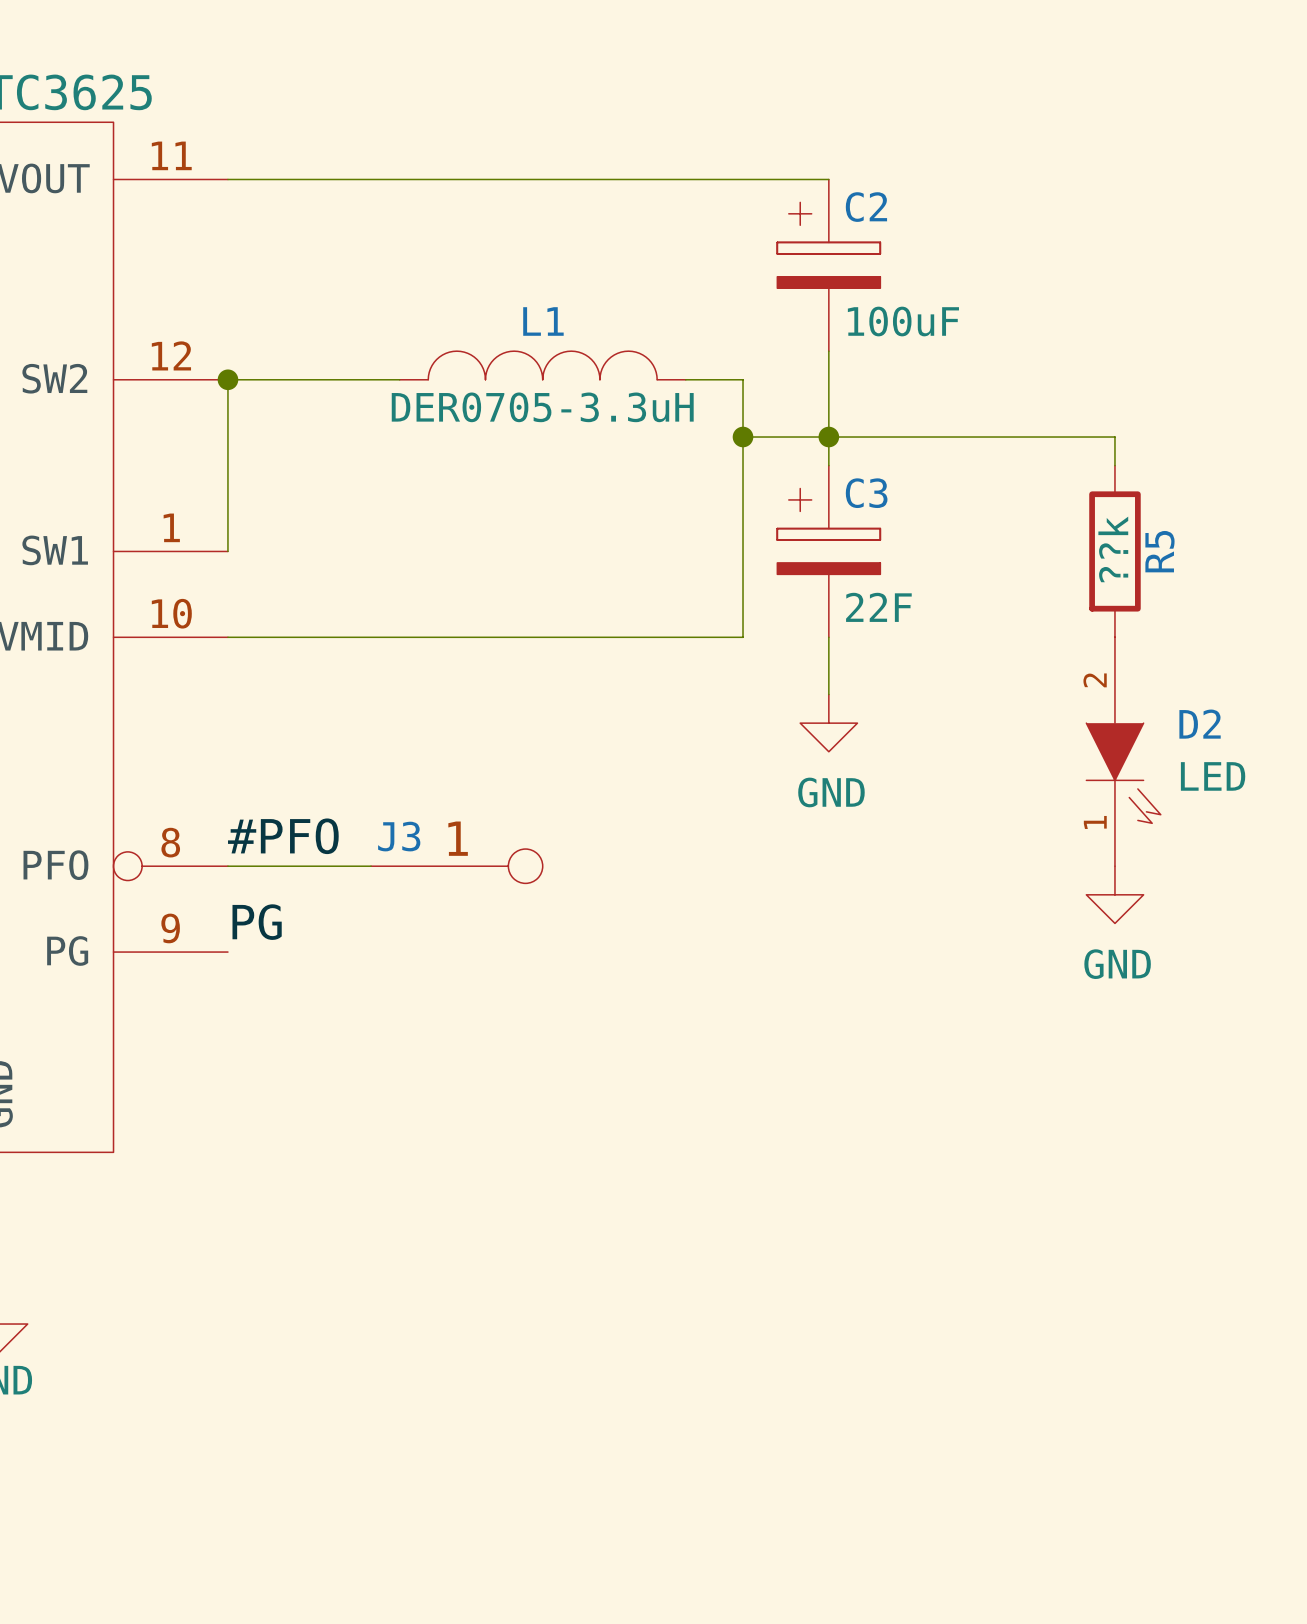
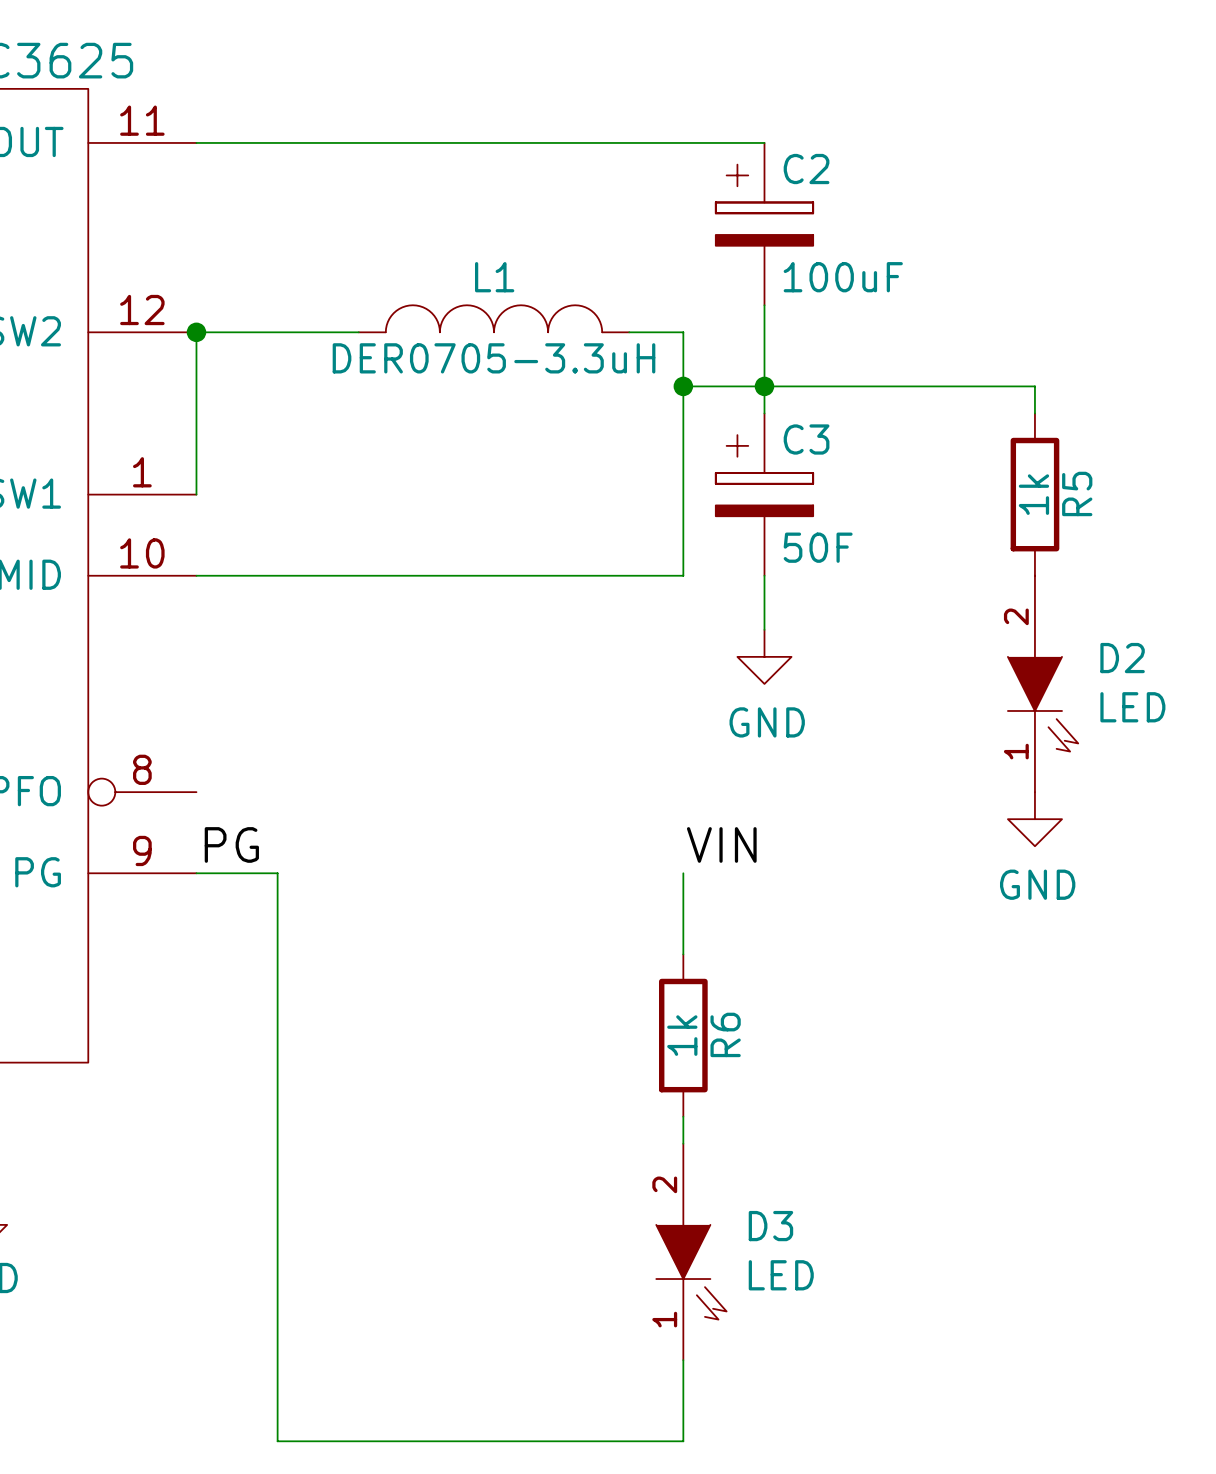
R5 value: ??k (1113, 549) -> 1k (1033, 494)
C3 value: 22F (878, 607) -> 50F (818, 547)
label: #PFO (283, 836) -> none
wire: (227, 866) (371, 866) -> none
J3: (456, 866) -> none
label: none -> VIN (721, 844)
wire: none -> (196, 873) (277, 873) (277, 1441) (683, 1441) (683, 1360)
wire: none -> (683, 873) (683, 954)
R6: none -> 1k (683, 1035)
wire: none -> (683, 1116) (683, 1143)
D3: none -> LED (691, 1251)

